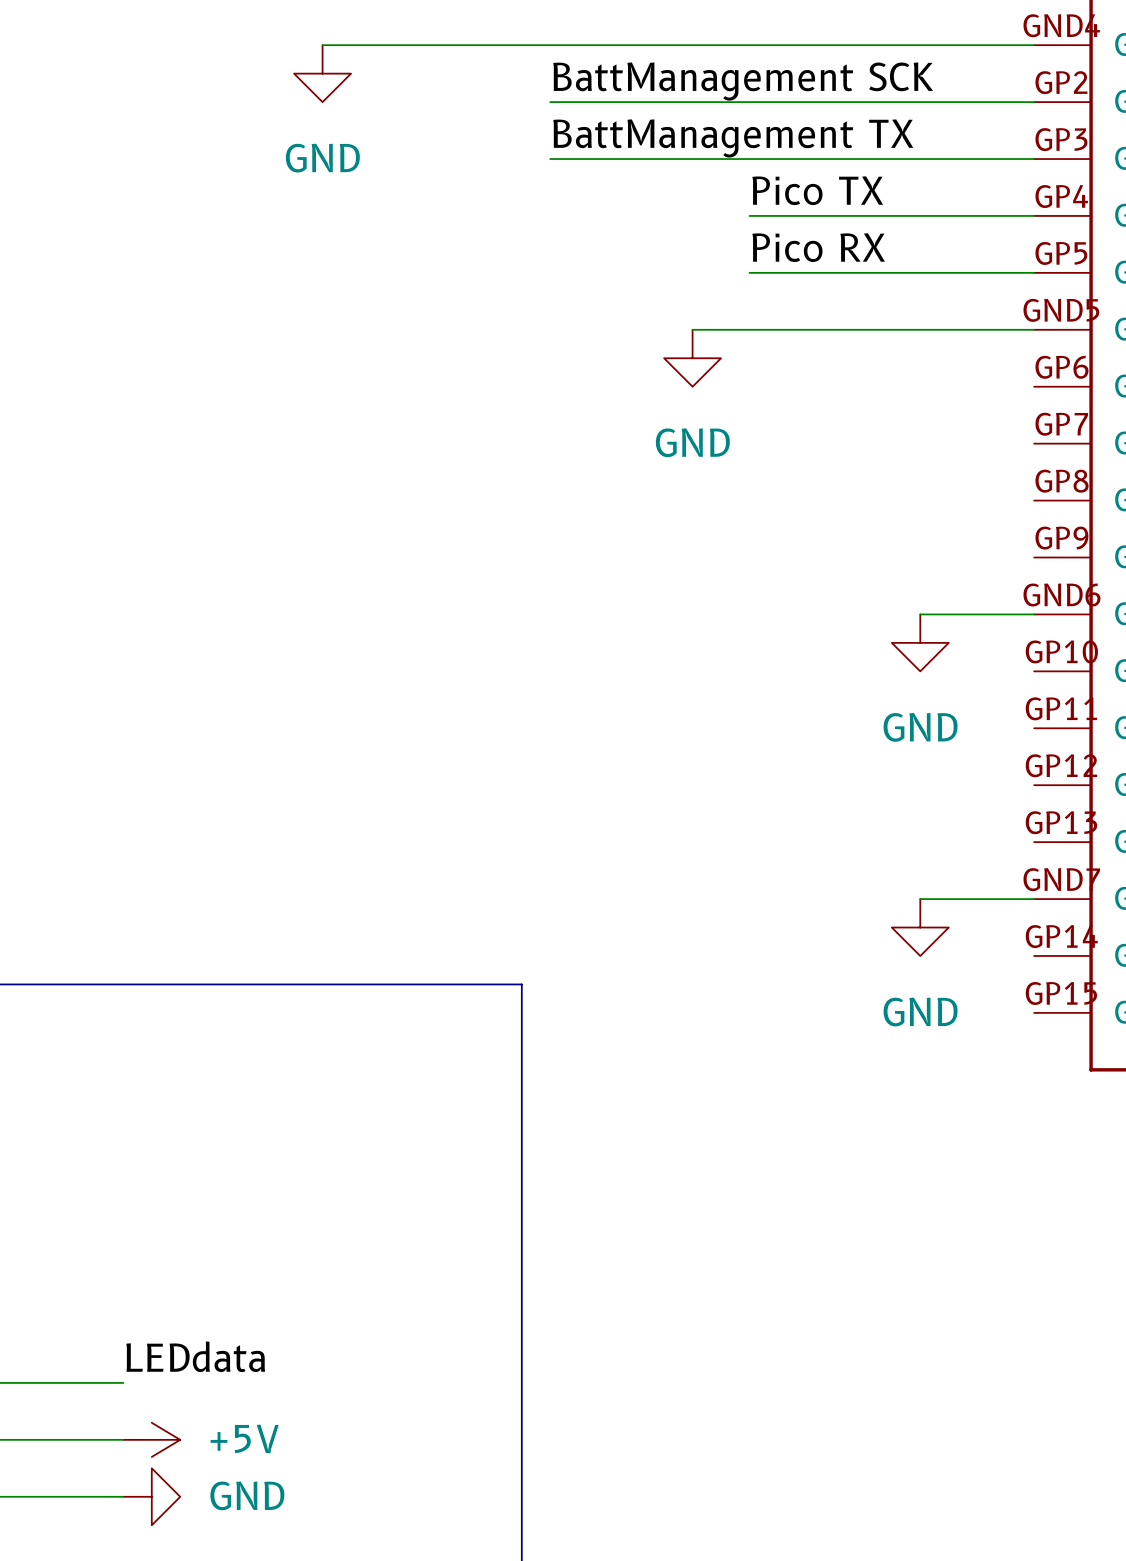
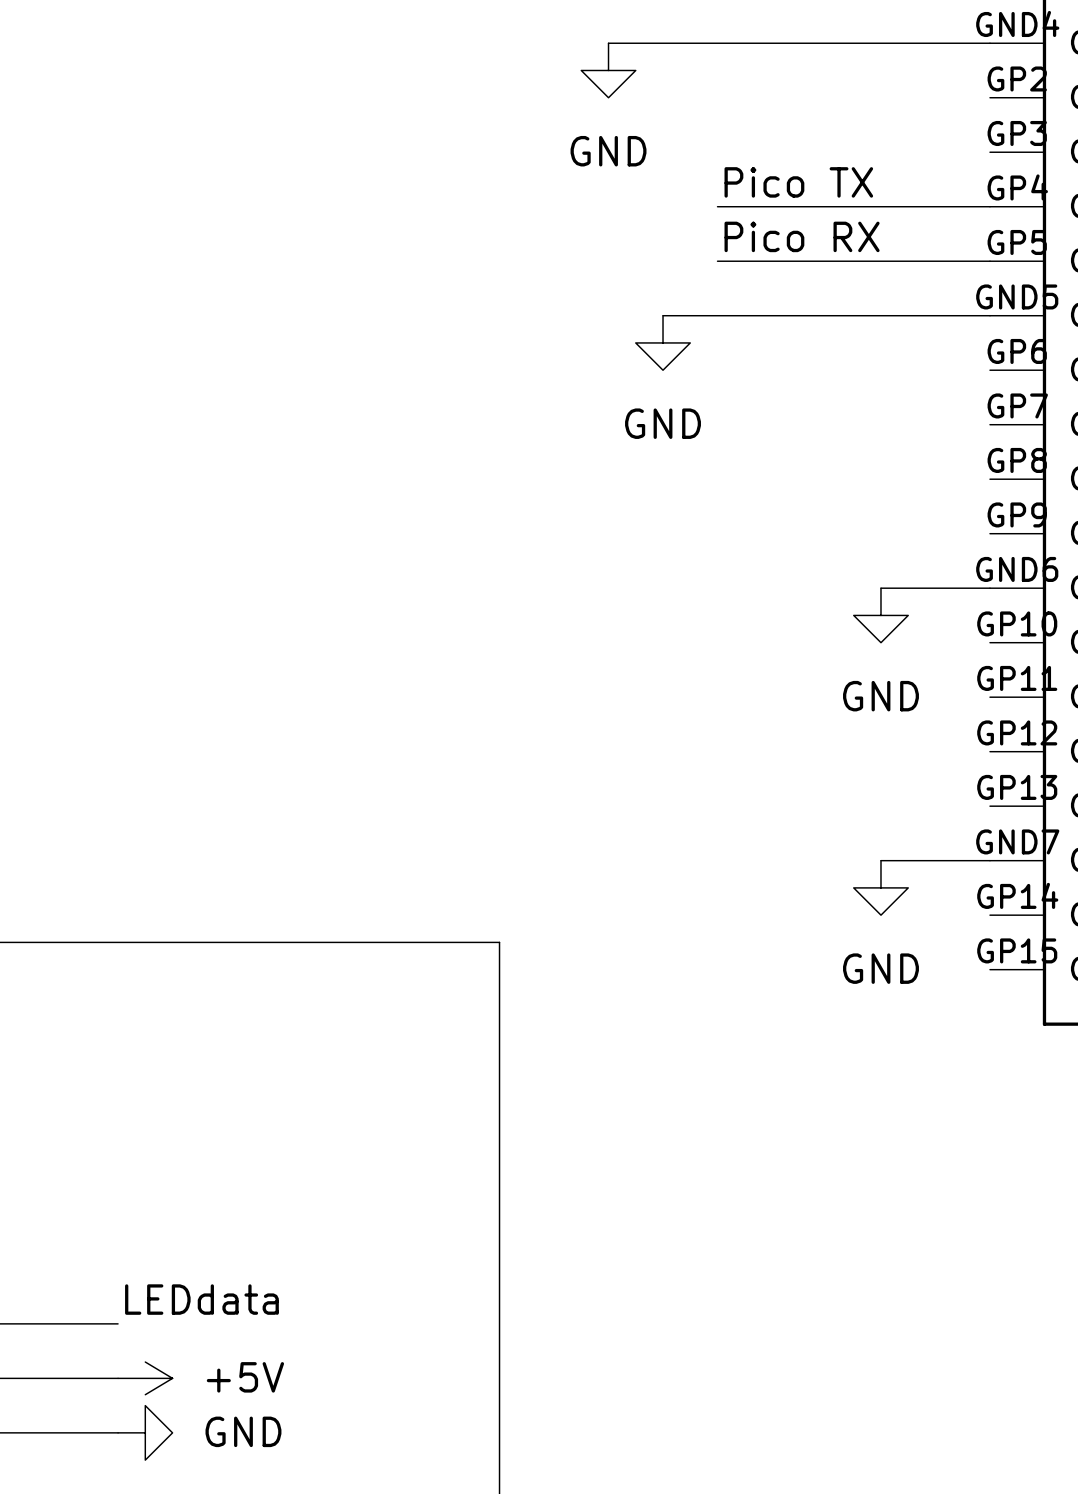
wire: (322, 45) (635, 45) -> none
power symbol position: GND (322, 73) -> GND (608, 70)
label: BattManagement SCK (743, 81) -> none
wire: (550, 102) (1034, 102) -> none
label: BattManagement TX (733, 138) -> none
wire: (550, 159) (1034, 159) -> none

